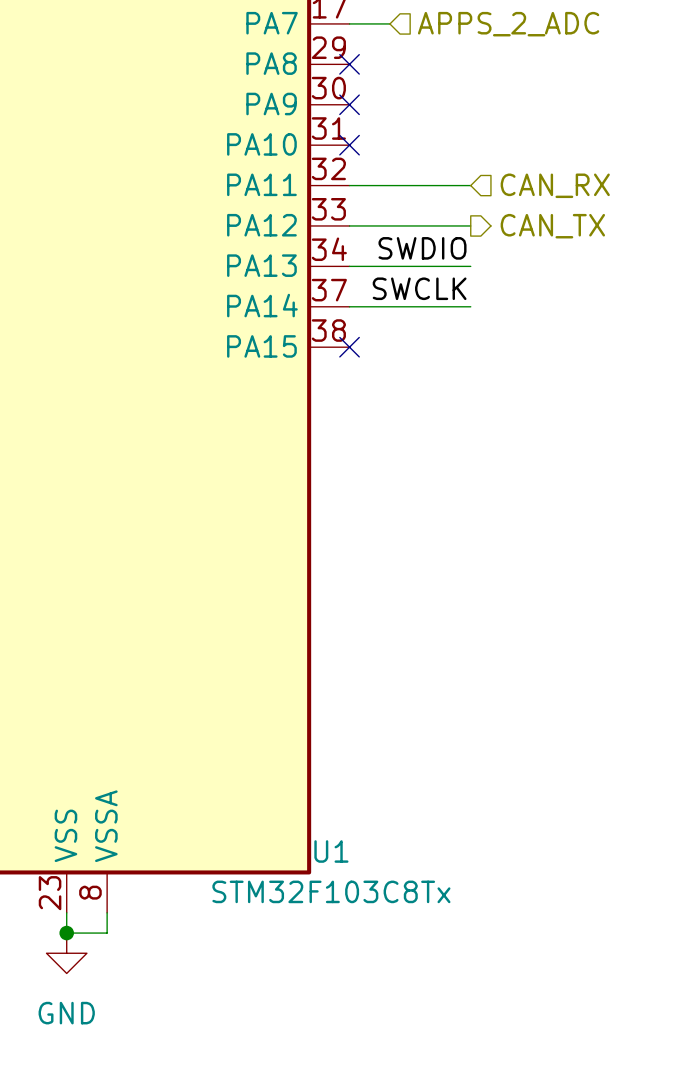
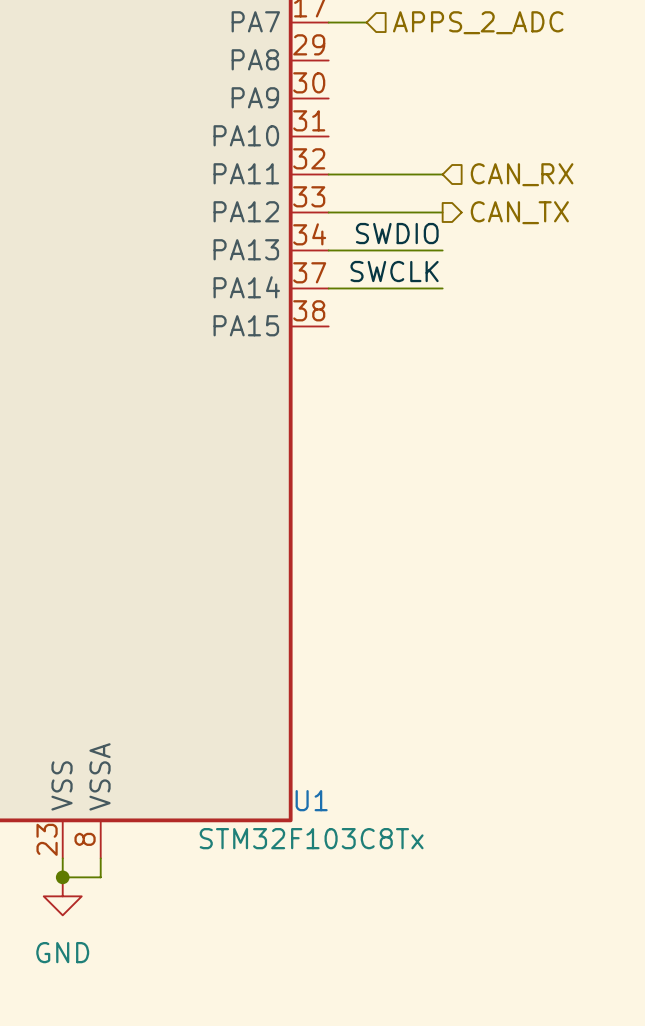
no-connect mark: (349, 64) -> none
no-connect mark: (349, 104) -> none
no-connect mark: (349, 145) -> none
no-connect mark: (349, 347) -> none

